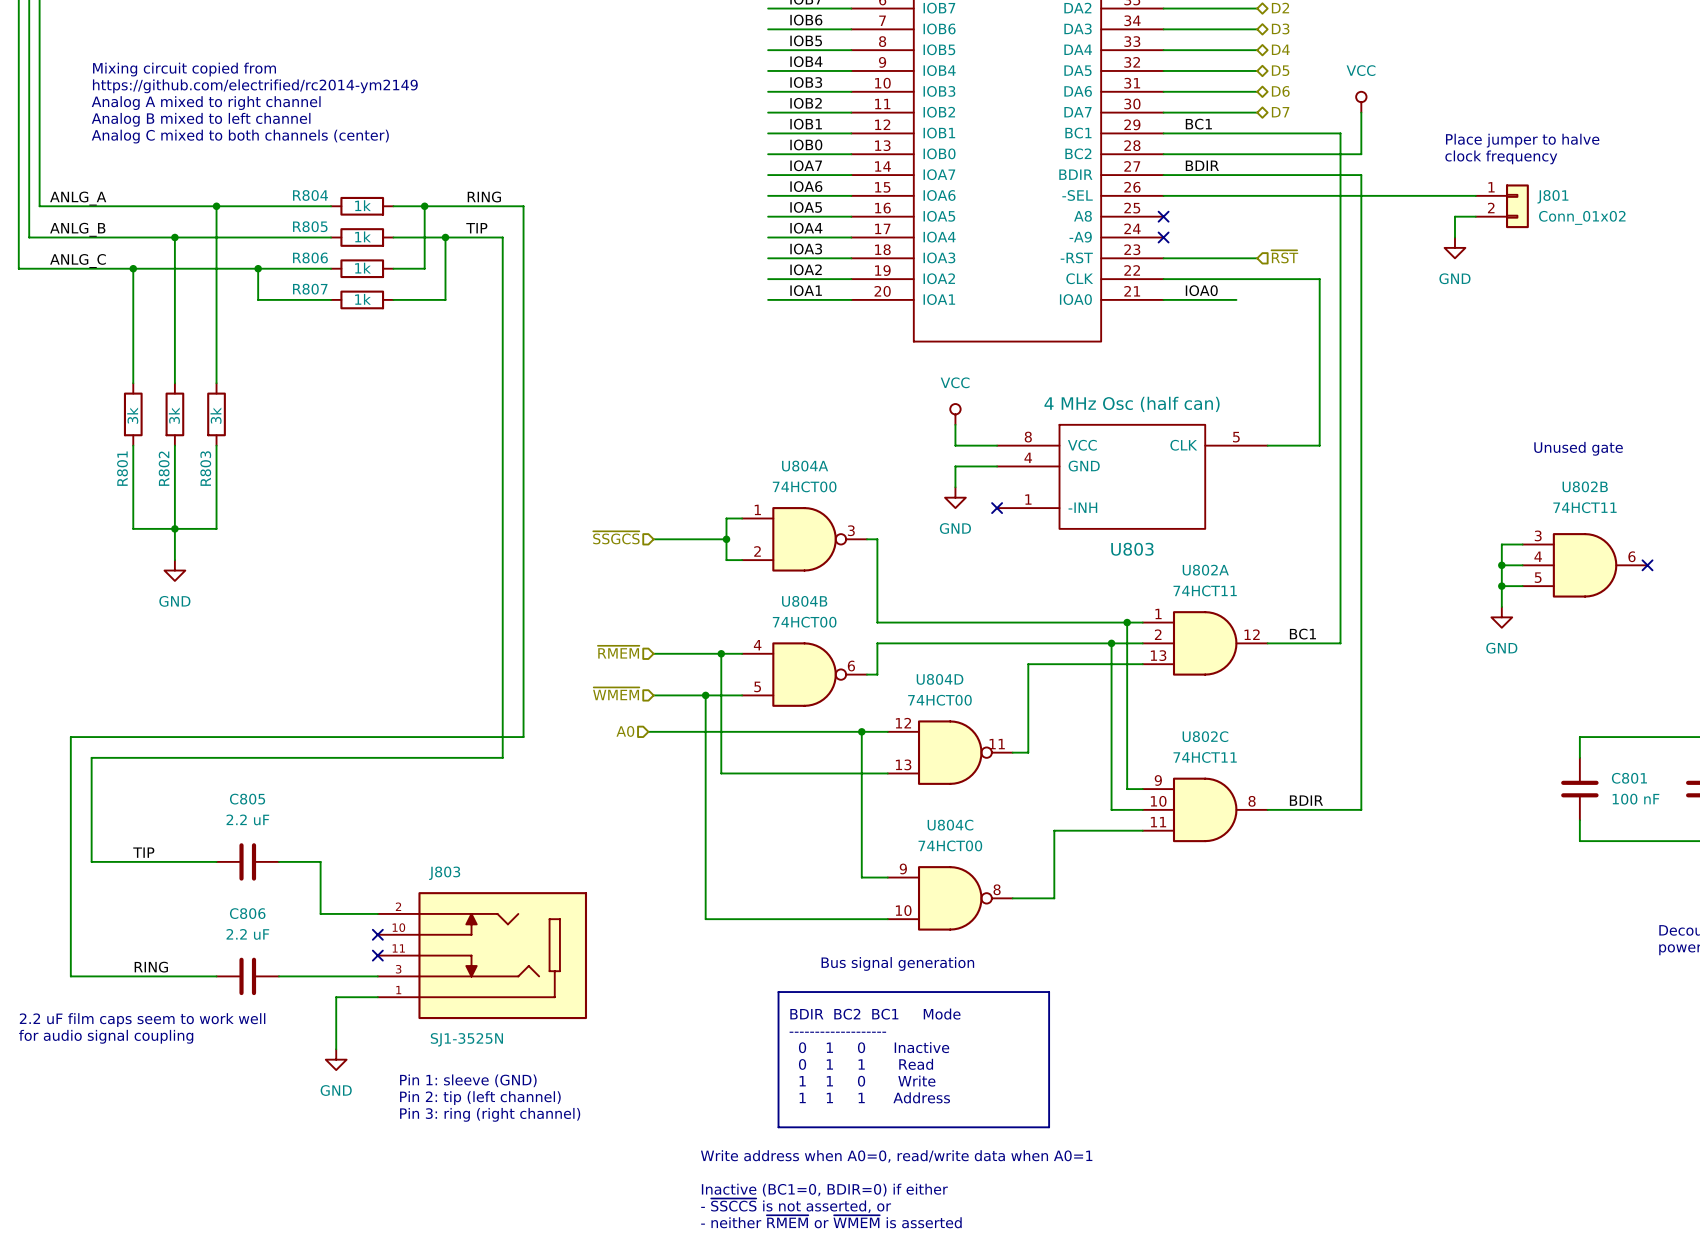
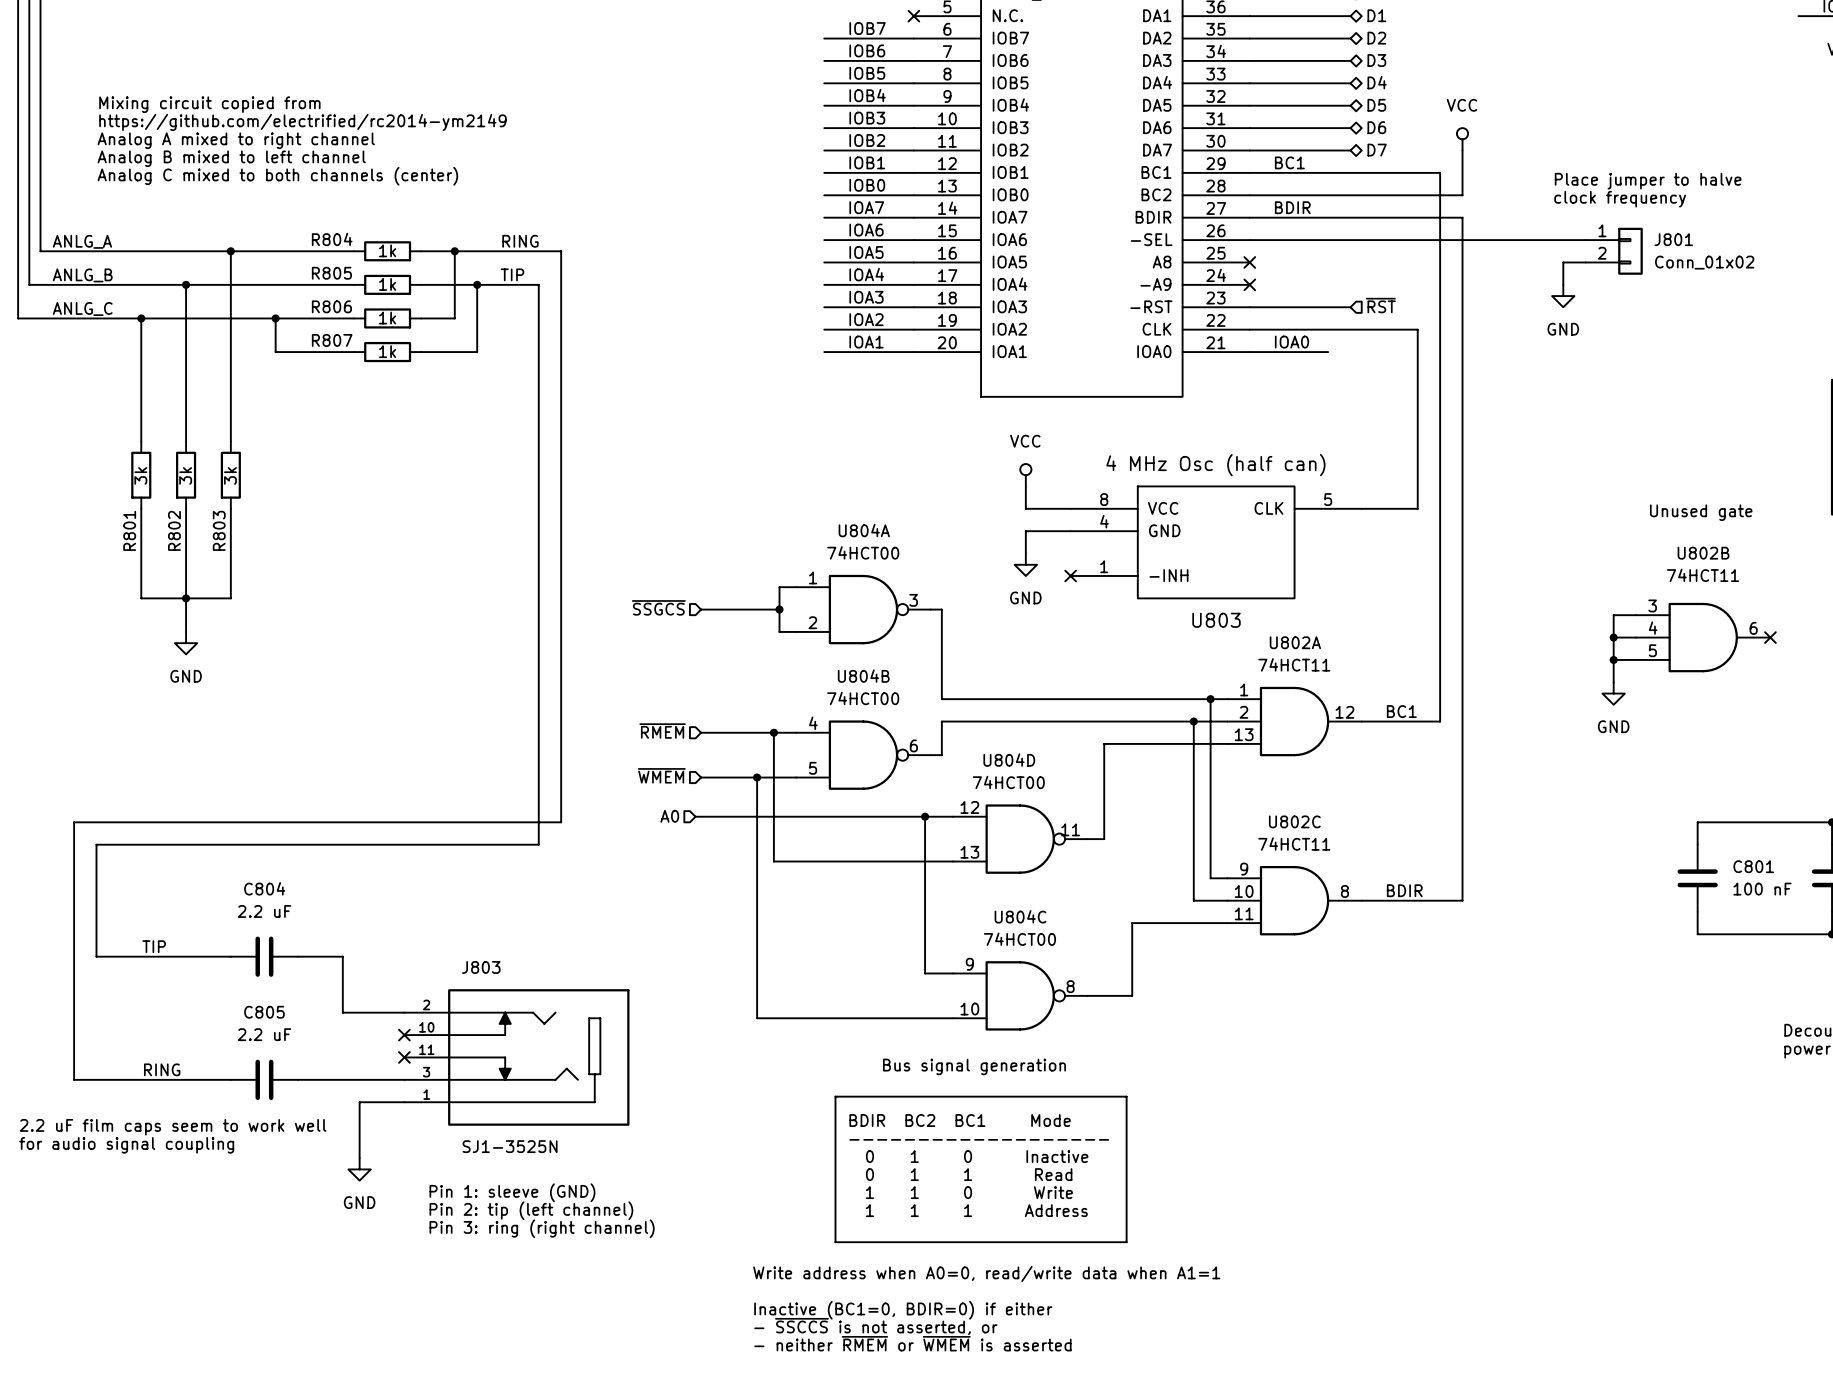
C805 name: C805 (247, 799) -> C804 (264, 888)
C806 name: C806 (247, 913) -> C805 (264, 1012)
text: Write address when A0=0, read/write data when A0=1 (896, 1156) -> Write address when A0=0, read/write data when A1=1 (986, 1273)

